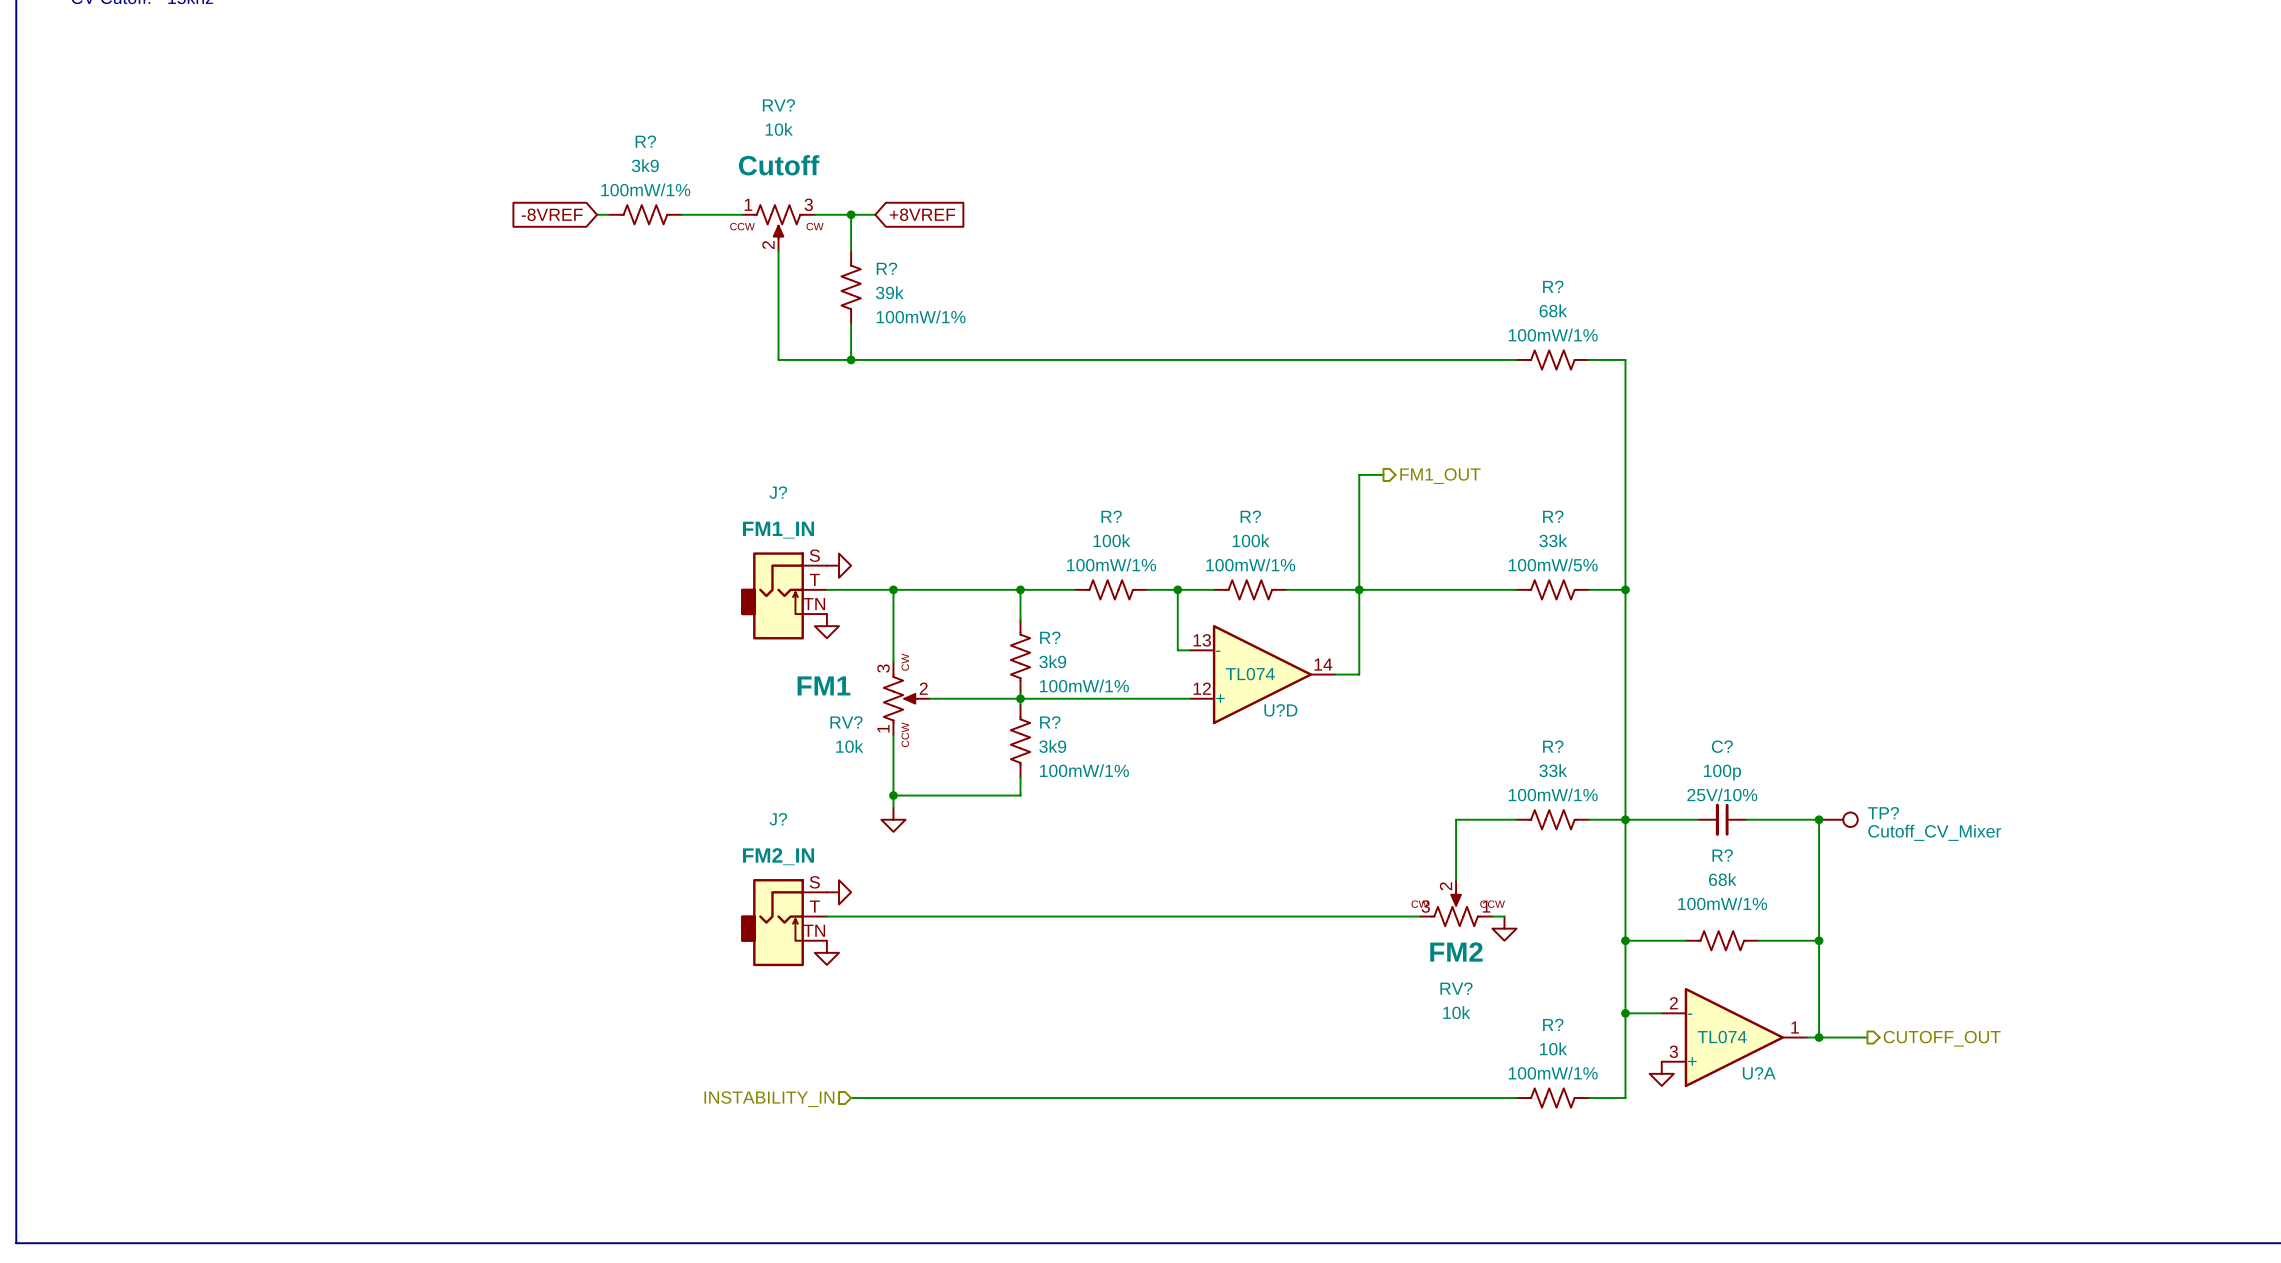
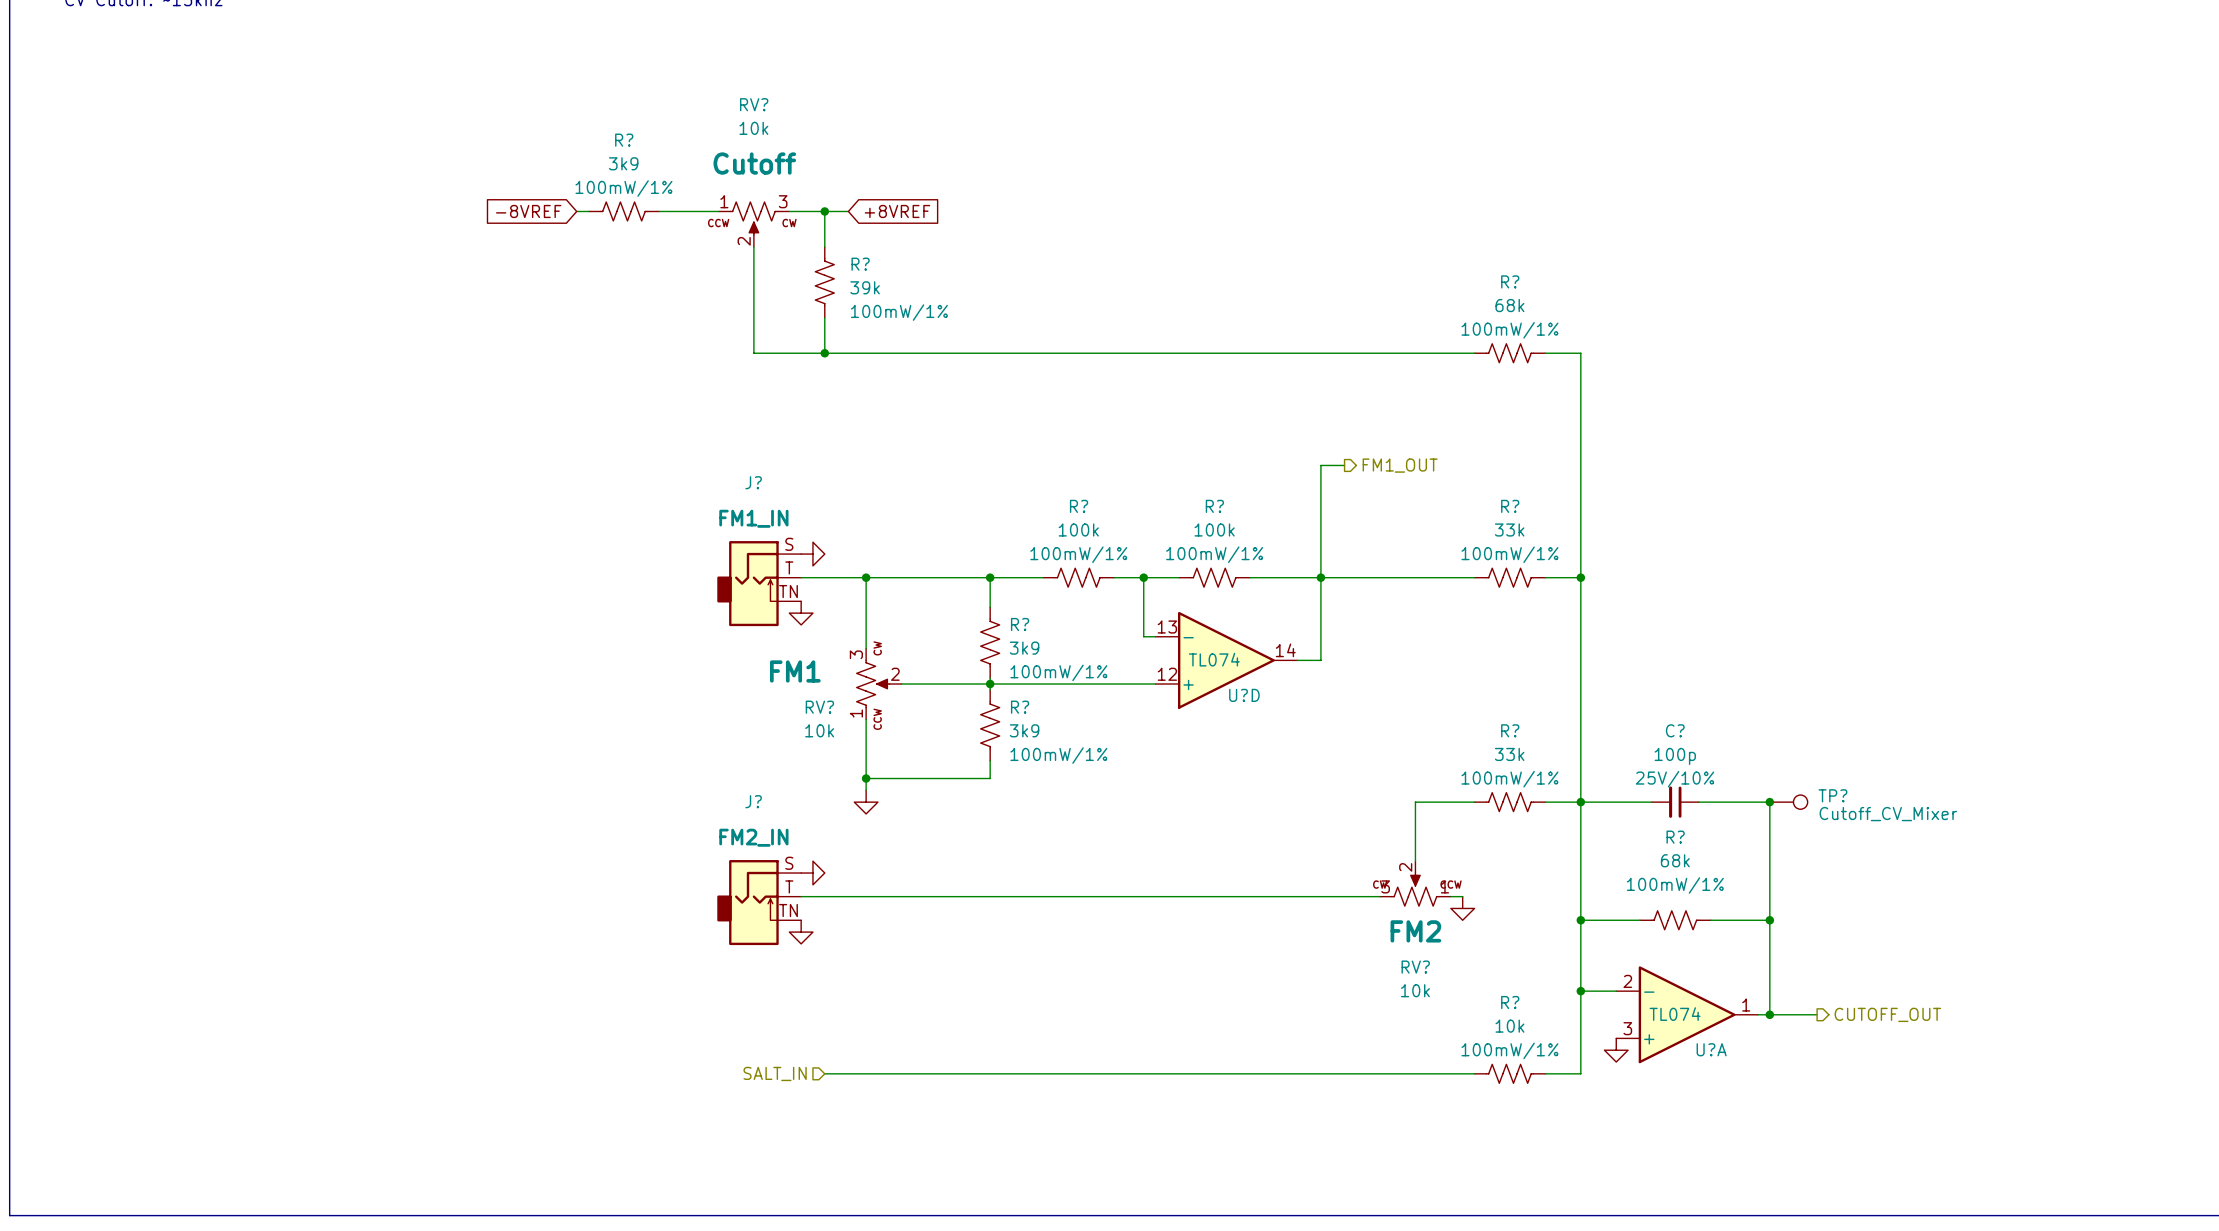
R? text: 100mW/5% (1553, 564) -> 100mW/1% (1509, 554)
hierarchical label: INSTABILITY_IN (769, 1099) -> SALT_IN (775, 1073)

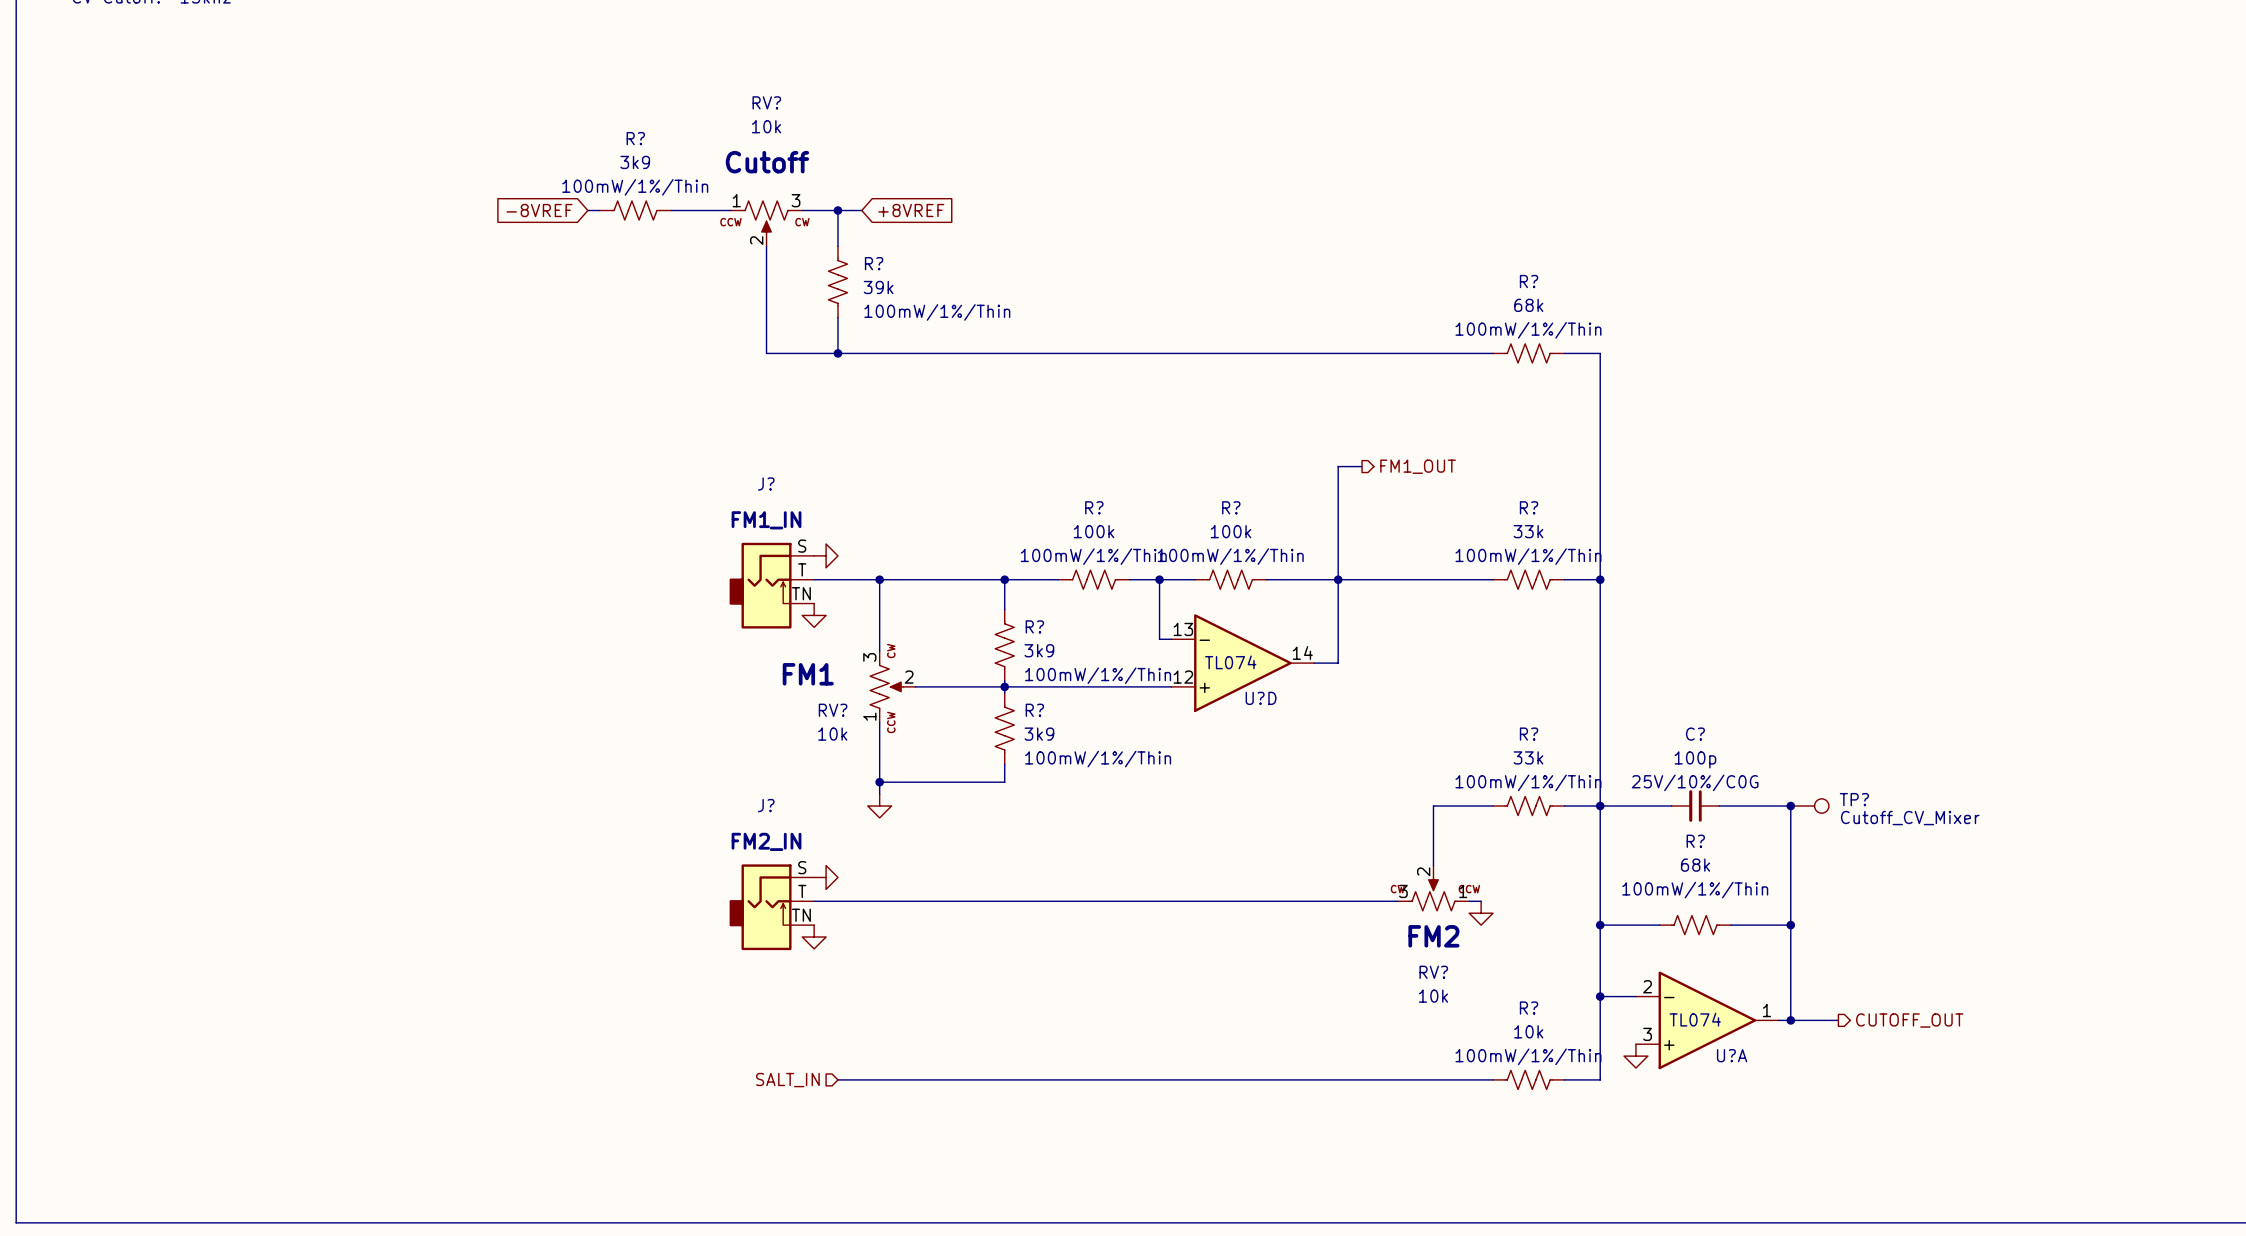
R? text: 100mW/1% (623, 188) -> 100mW/1%/Thin (635, 187)
R? text: 100mW/1% (899, 312) -> 100mW/1%/Thin (937, 312)
R? text: 100mW/1% (1509, 330) -> 100mW/1%/Thin (1528, 330)
R? text: 100mW/1% (1078, 554) -> 100mW/1%/Thin (1093, 556)
R? text: 100mW/1% (1214, 554) -> 100mW/1%/Thin (1230, 556)
R? text: 100mW/1% (1509, 554) -> 100mW/1%/Thin (1528, 556)
R? text: 100mW/1% (1058, 672) -> 100mW/1%/Thin (1098, 675)
R? text: 100mW/1% (1058, 755) -> 100mW/1%/Thin (1098, 759)
R? text: 100mW/1% (1509, 779) -> 100mW/1%/Thin (1528, 782)
C? text: 25V/10% (1674, 779) -> 25V/10%/C0G (1695, 782)
R? text: 100mW/1% (1675, 885) -> 100mW/1%/Thin (1695, 890)
R? text: 100mW/1% (1509, 1050) -> 100mW/1%/Thin (1528, 1056)

